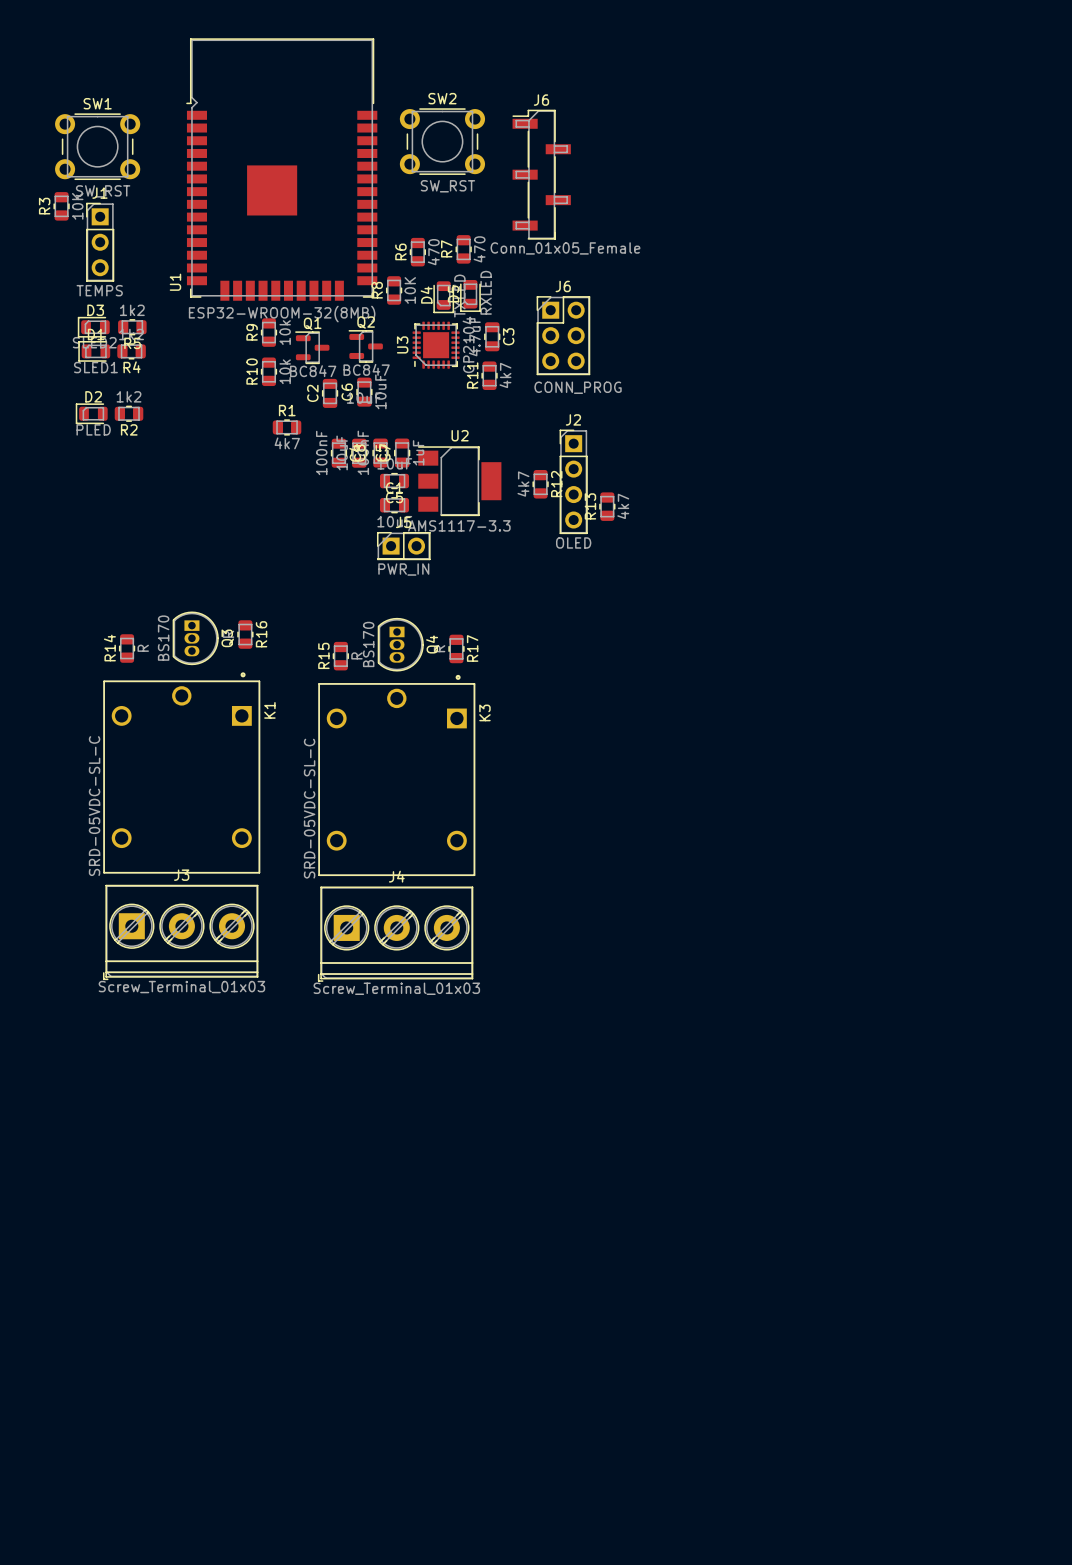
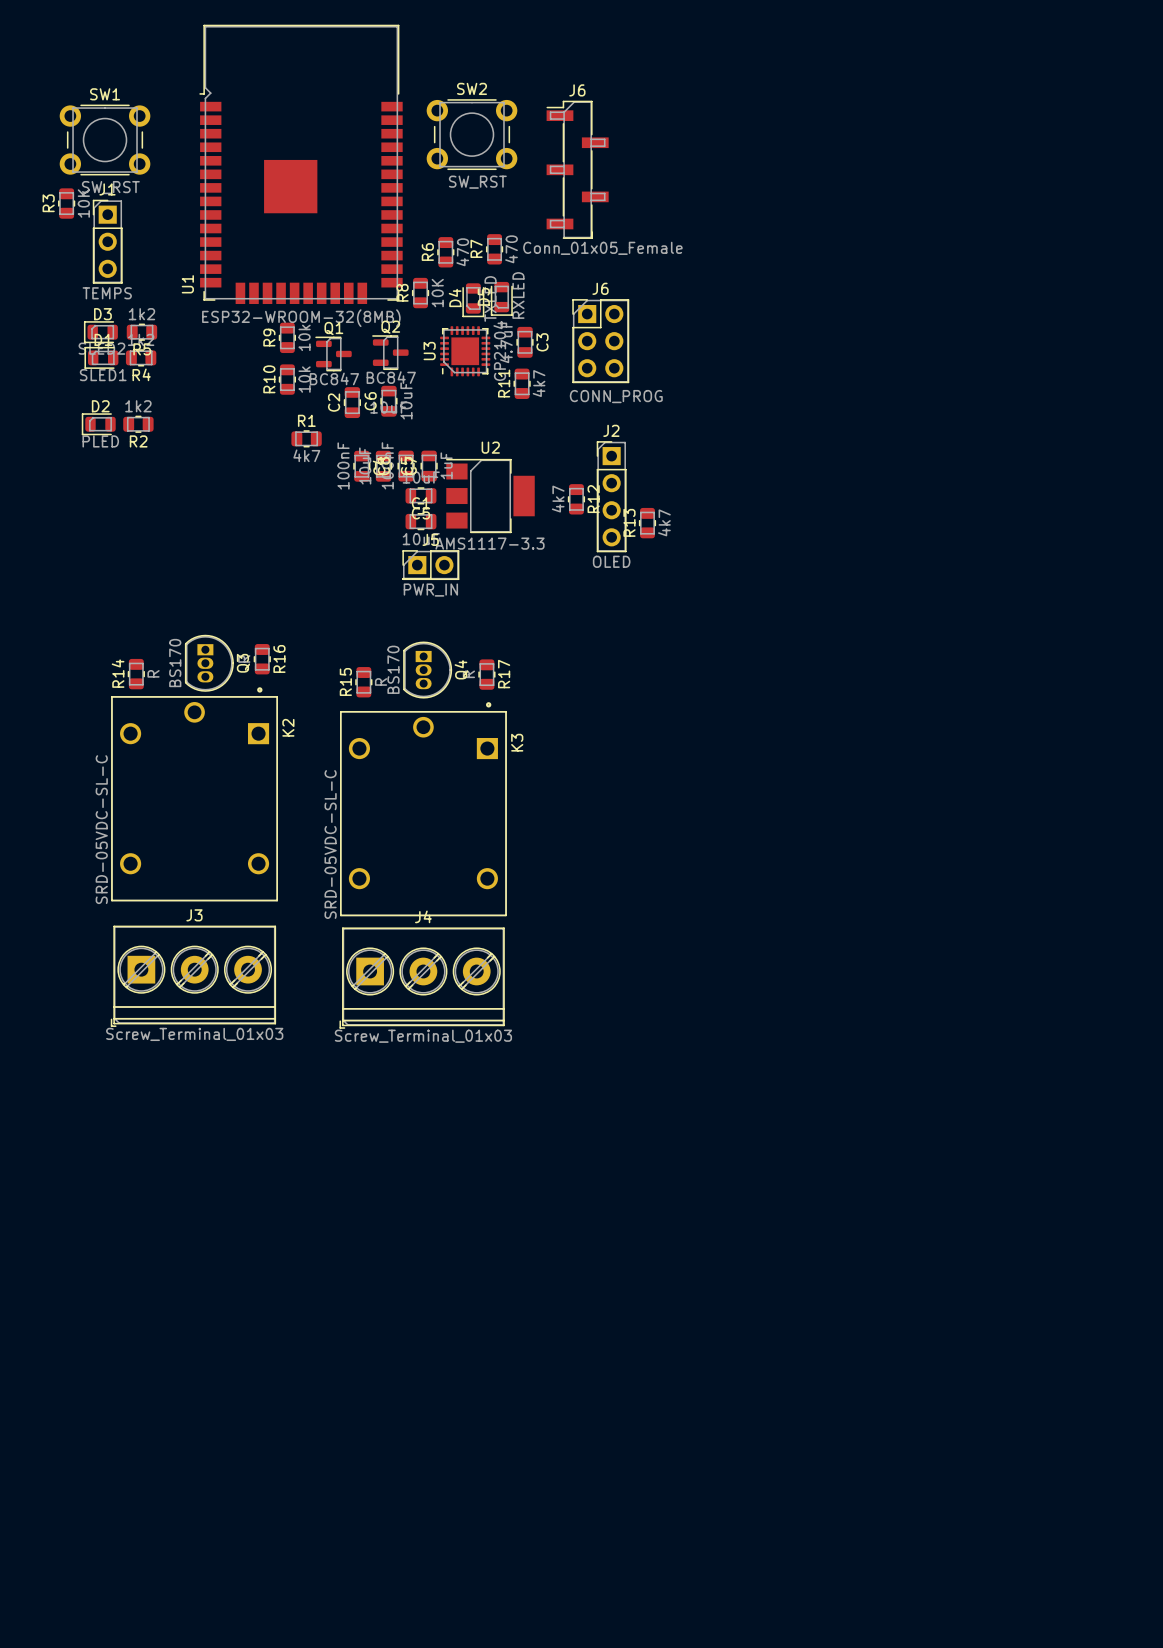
K2: none -> SRD-05VDC-SL-C (194, 794)
K1: SRD-05VDC-SL-C (181, 772) -> none

